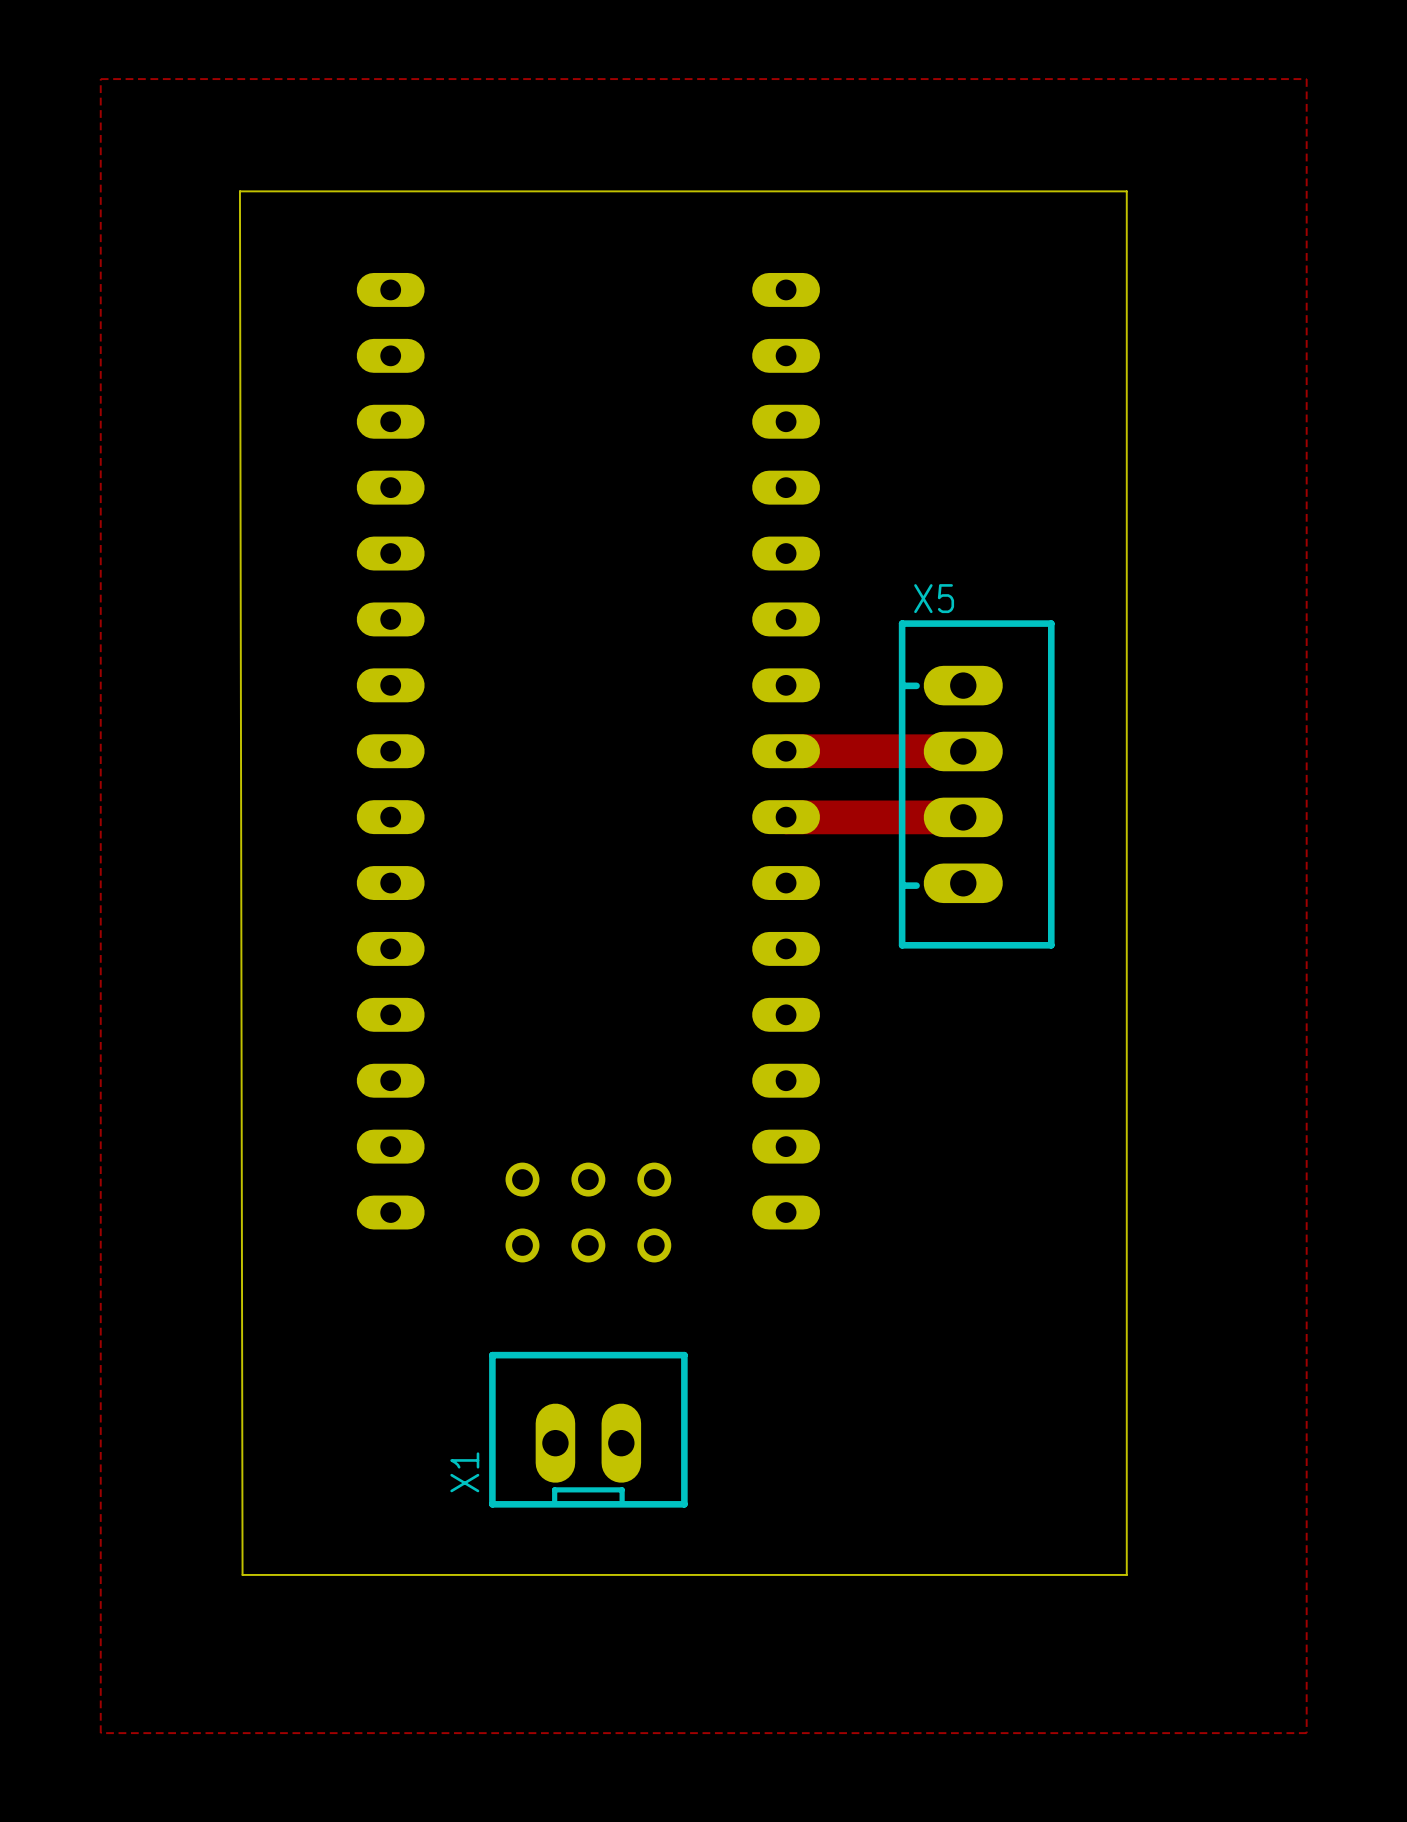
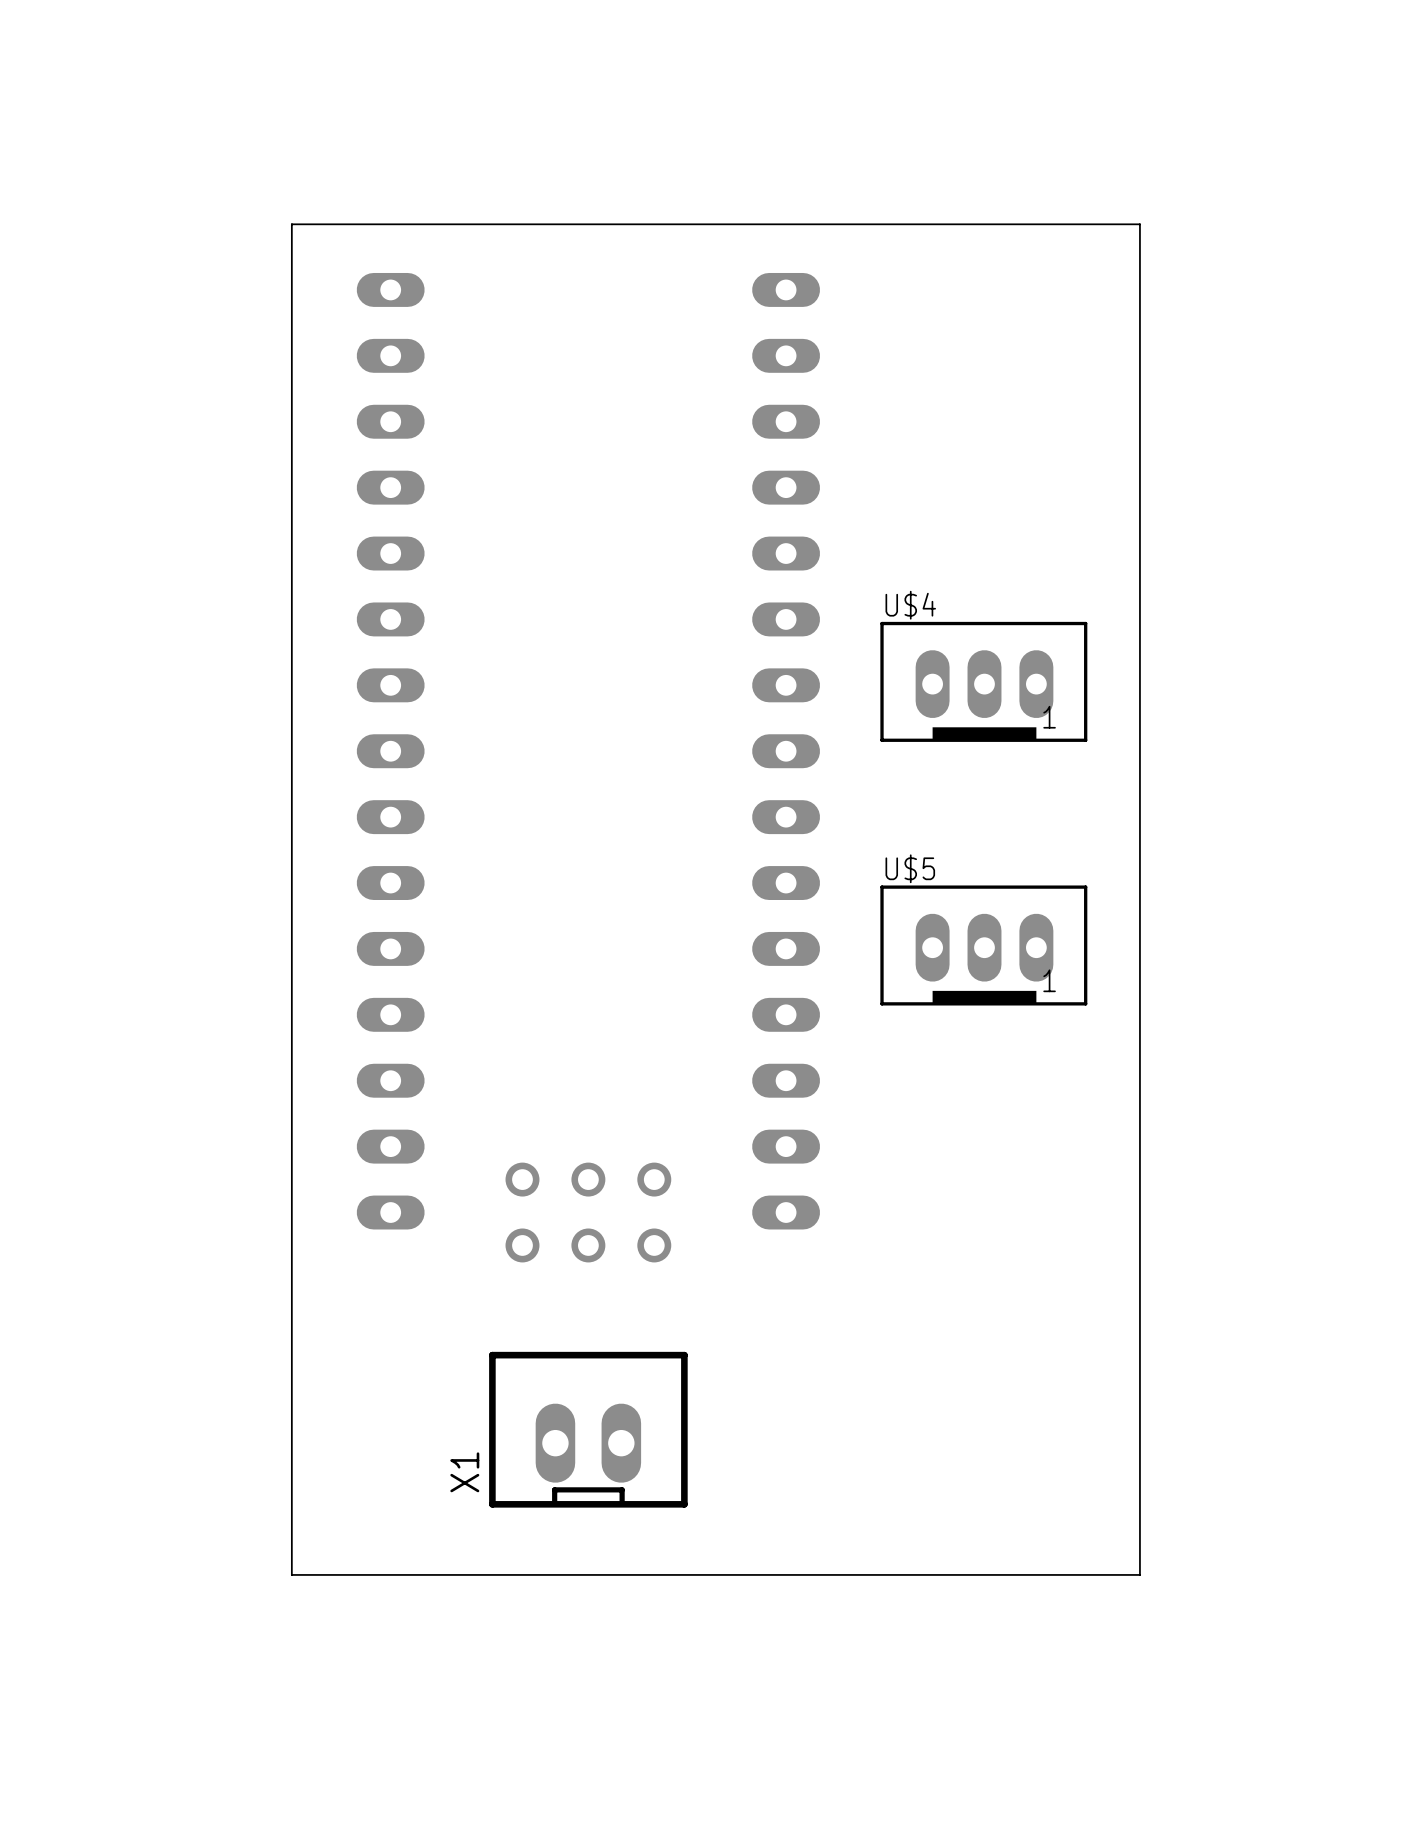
zone outline: (100, 79) (100, 1733) (1306, 1733) (1306, 79) (100, 79) -> none
U$4: none -> (983, 681)
track: (786, 751) (963, 751) -> none
X5: (976, 784) -> none
track: (786, 817) (963, 817) -> none
U$5: none -> (983, 945)
board edge: (291, 1574) (242, 1574) (239, 191) (1126, 191) (1126, 1574) -> (291, 1574) (291, 224) (1139, 224) (1139, 1574) (1126, 1574)

